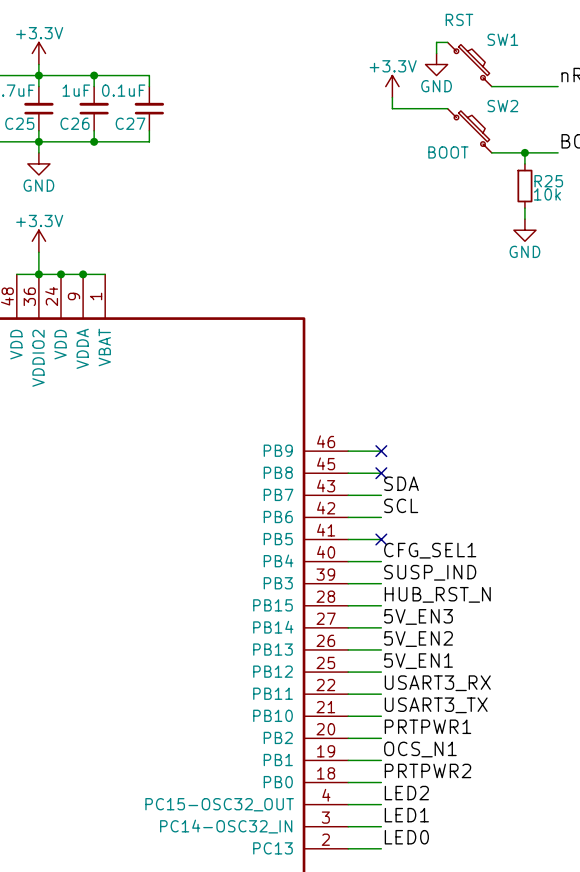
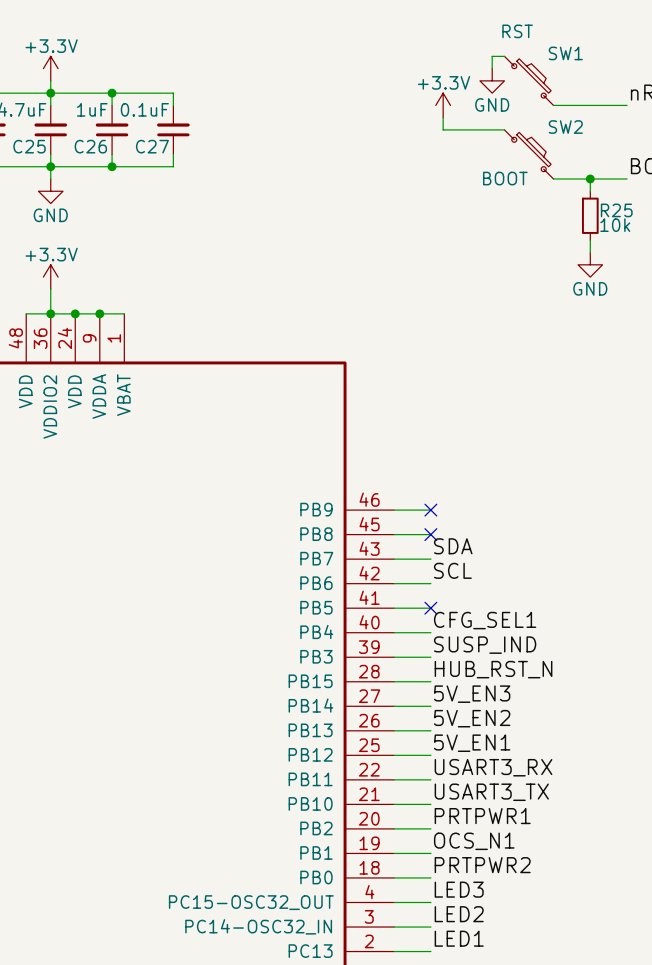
label: LED2 (406, 793) -> LED3 (459, 889)
label: LED1 (406, 815) -> LED2 (459, 914)
label: LED0 (406, 837) -> LED1 (459, 938)

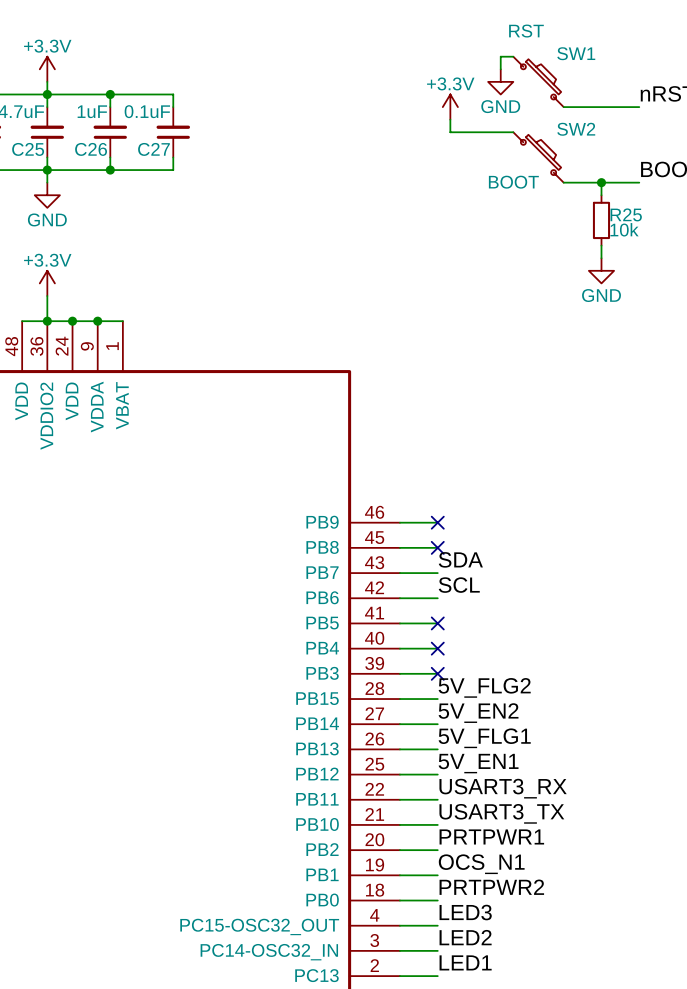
label: CFG_SEL1 (485, 620) -> none
no-connect mark: none -> (437, 648)
label: SUSP_IND (485, 645) -> none
no-connect mark: none -> (437, 673)
label: HUB_RST_N (493, 669) -> 5V_FLG2 (484, 687)
label: 5V_EN3 (472, 694) -> 5V_EN2 (478, 713)
label: 5V_EN2 (472, 718) -> 5V_FLG1 (484, 738)

